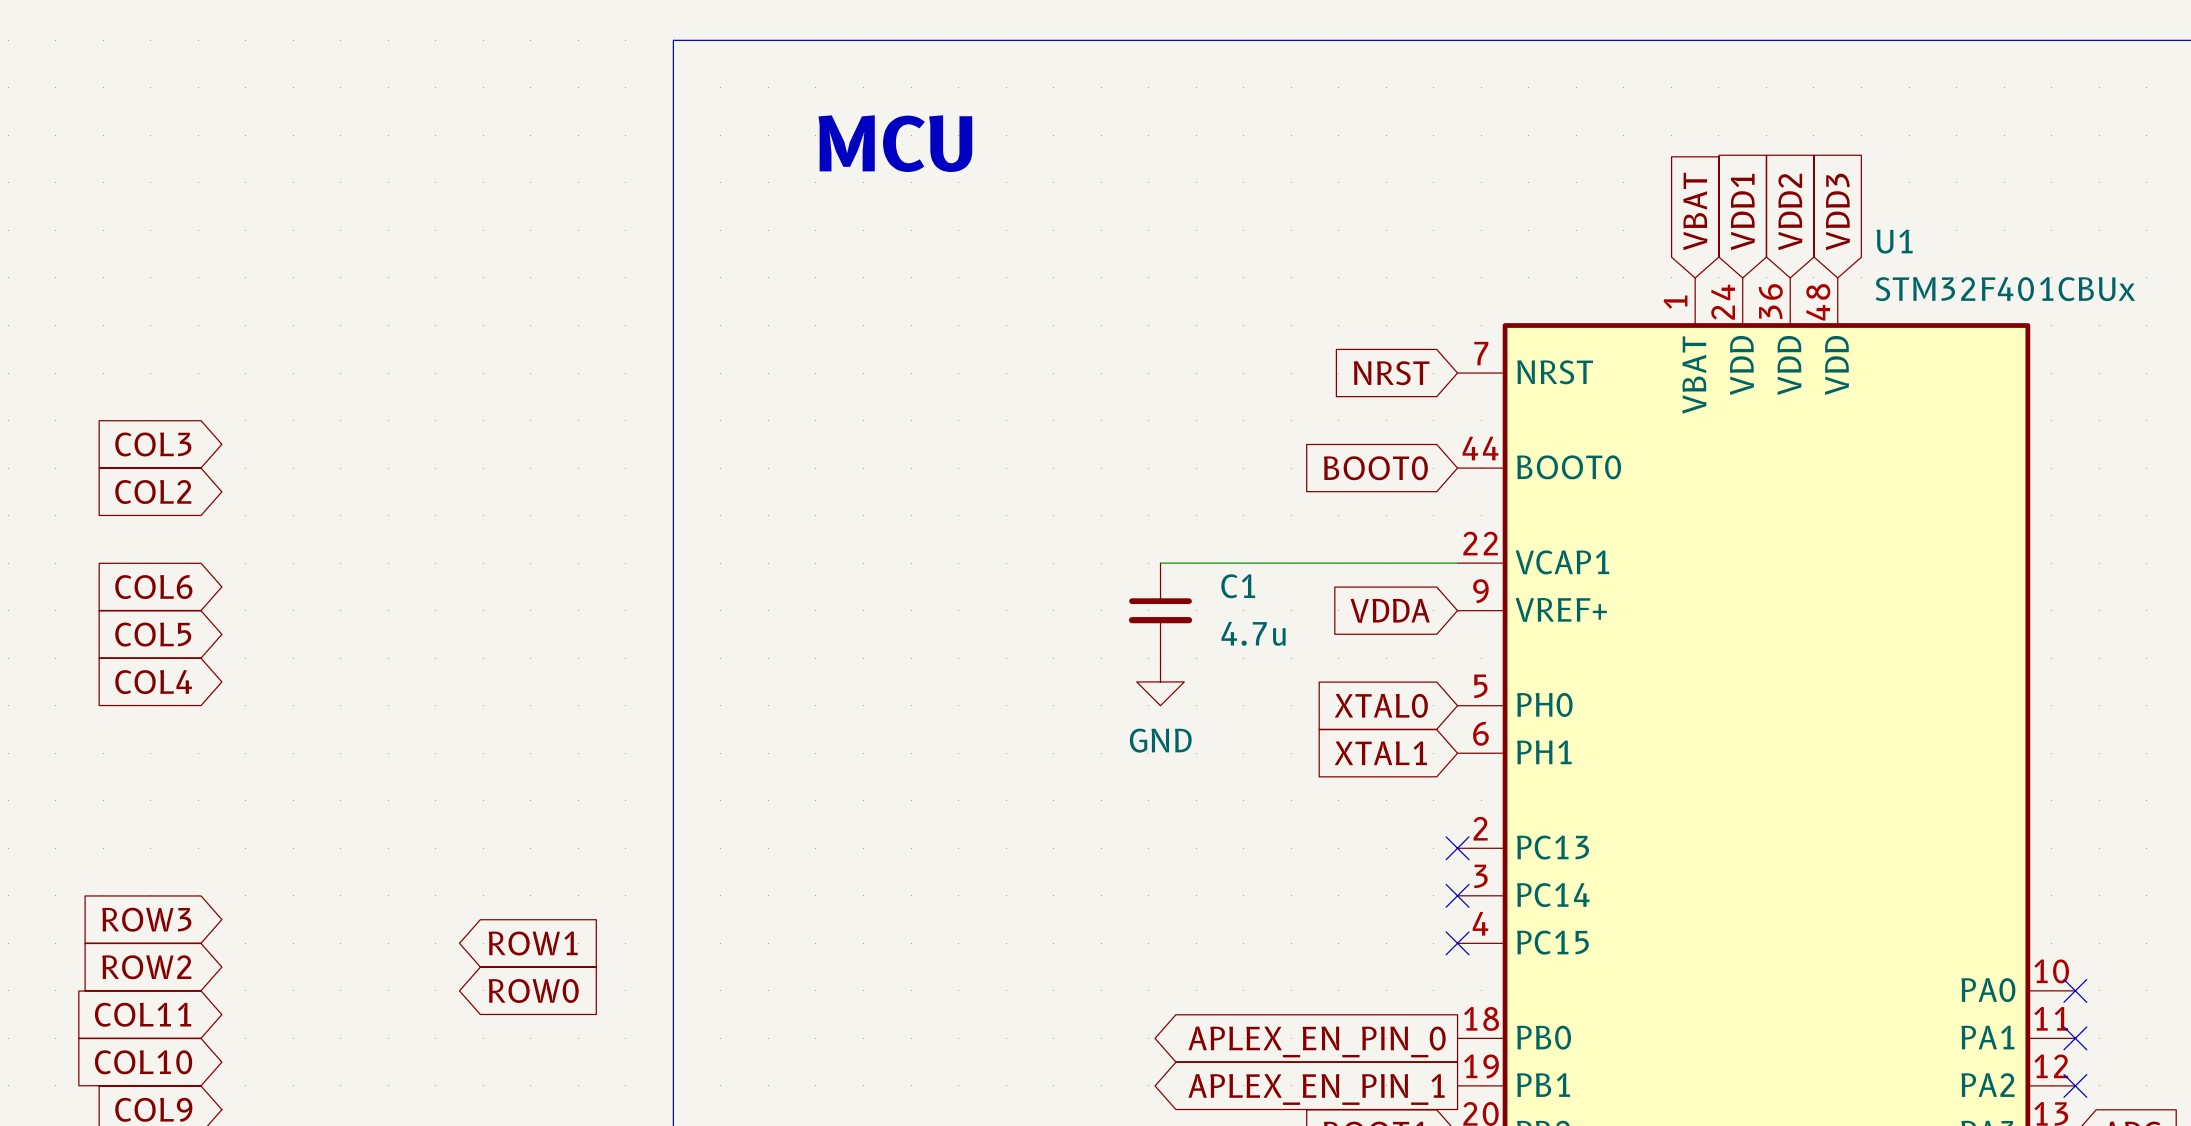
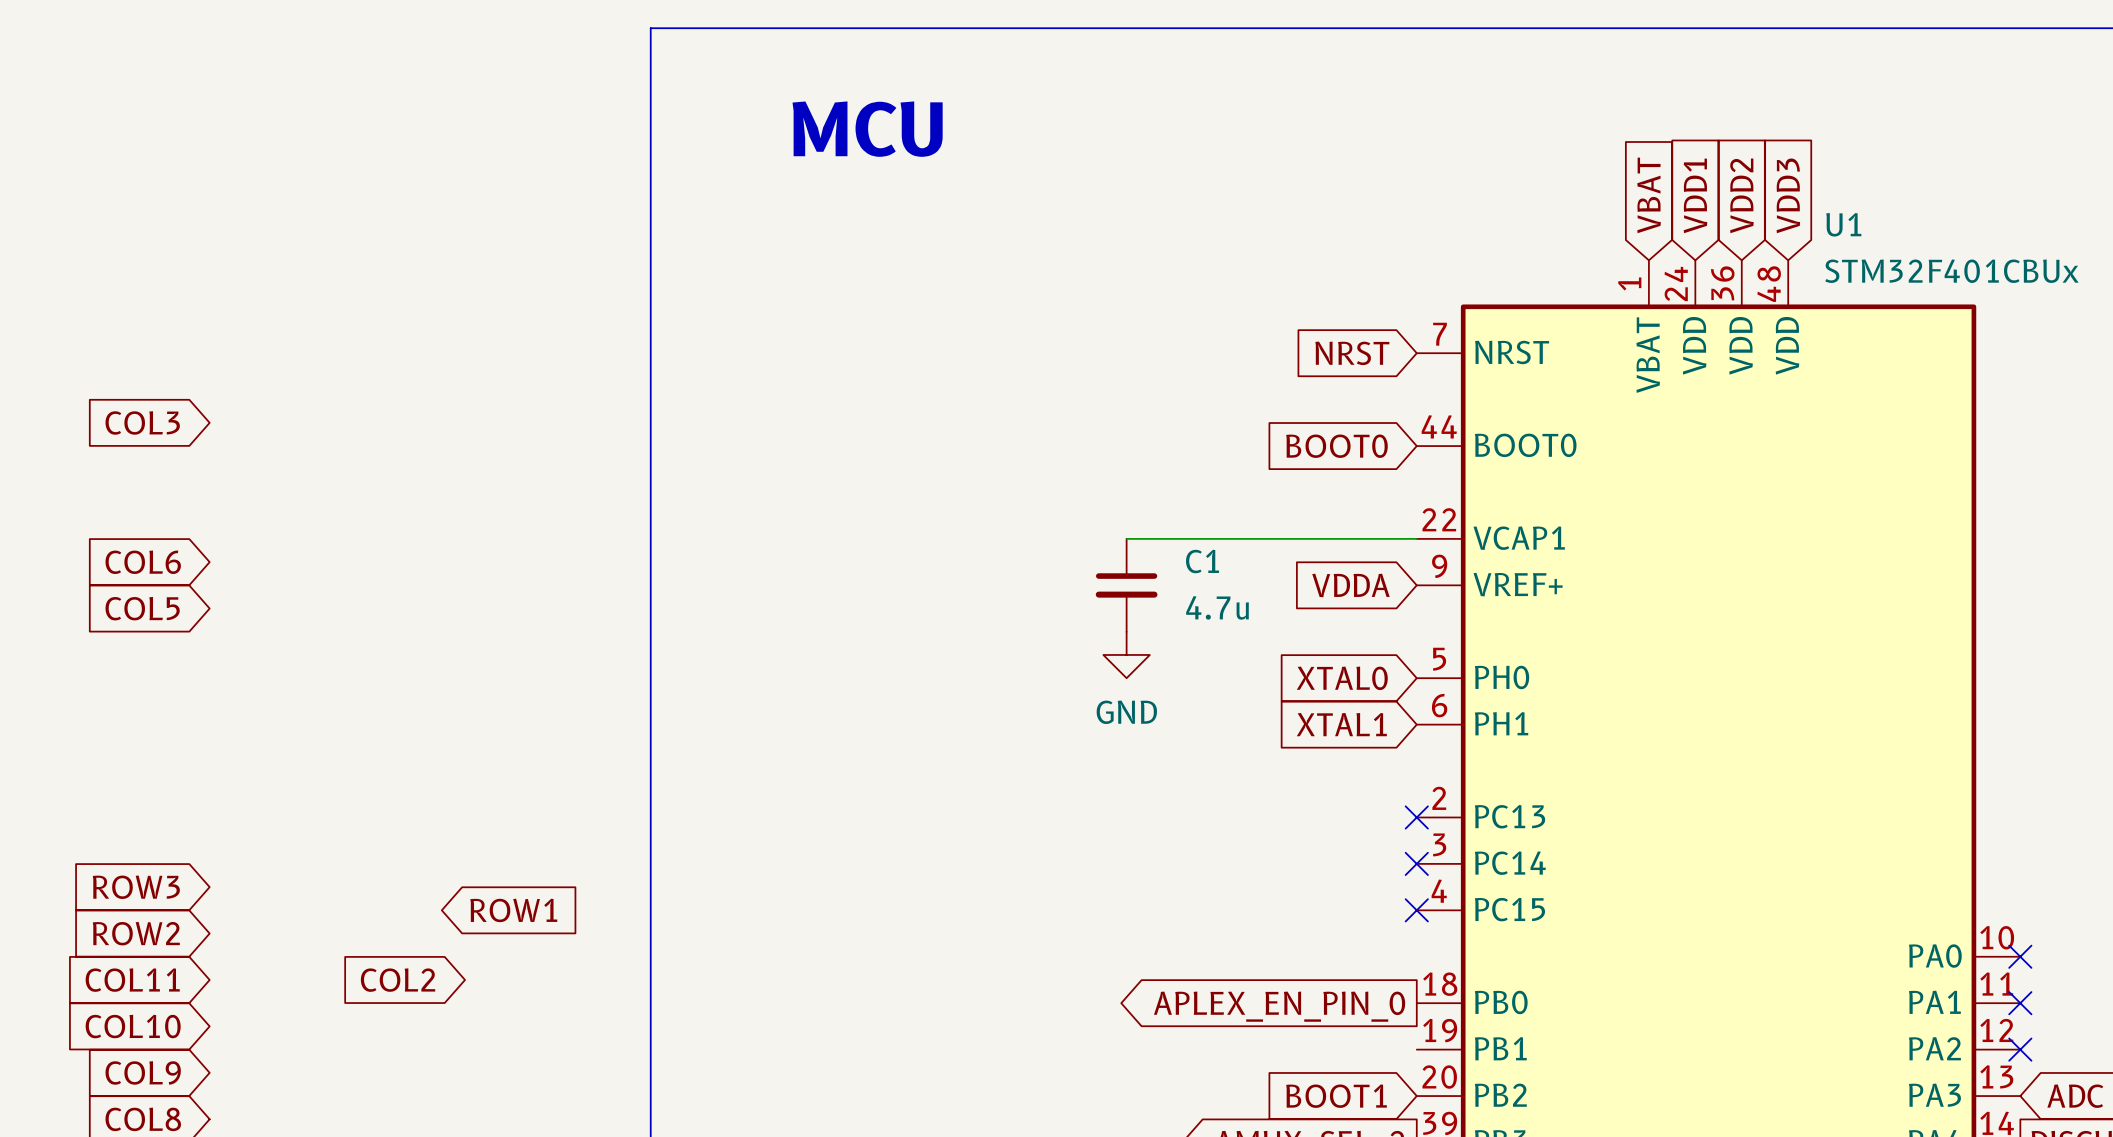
global label: COL2 (153, 491) -> none
global label: COL4 (153, 682) -> none
global label: ROW0 (533, 990) -> none
global label: none -> COL2 (398, 980)
global label: APLEX_EN_PIN_1 (1316, 1089) -> none

